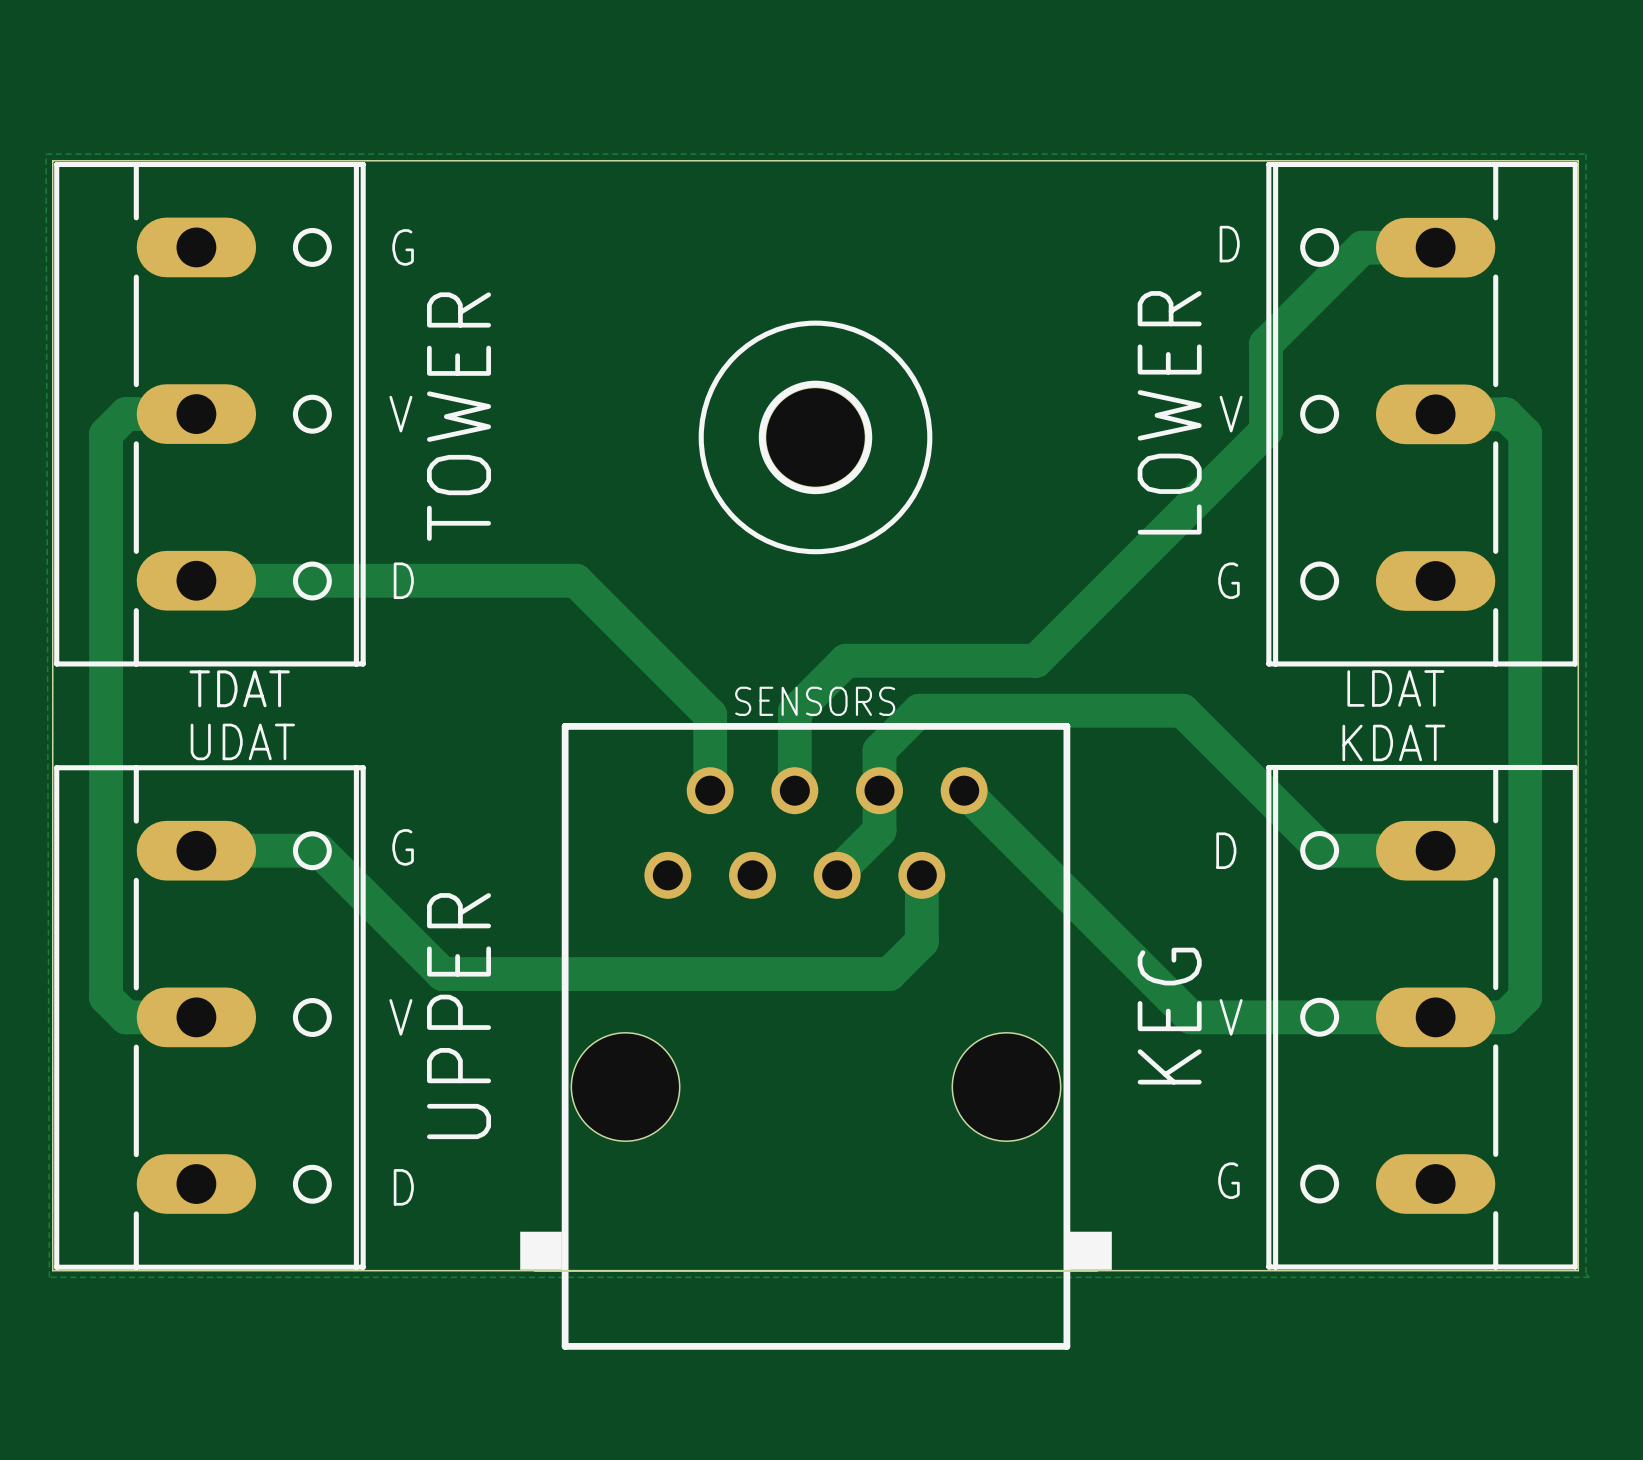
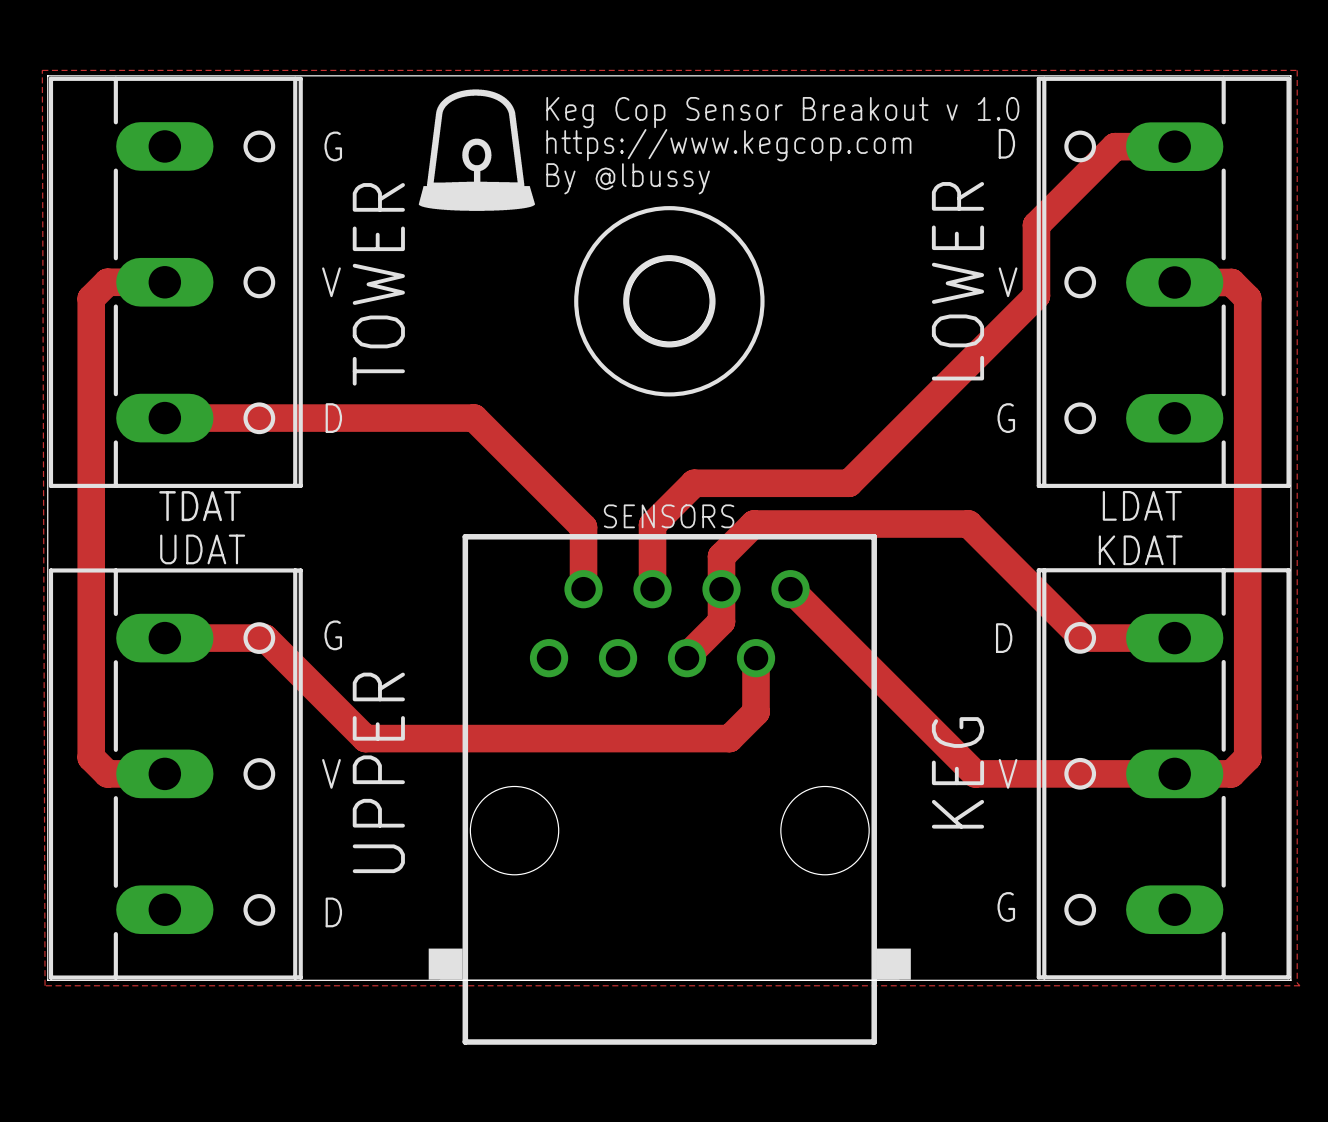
drawing: none -> [418, 89, 536, 211]
text: none -> Keg Cop Sensor Breakout v 1.0 (782, 112)
text: none -> https://www.kegcop.com (728, 145)
text: none -> By @lbussy (628, 178)

